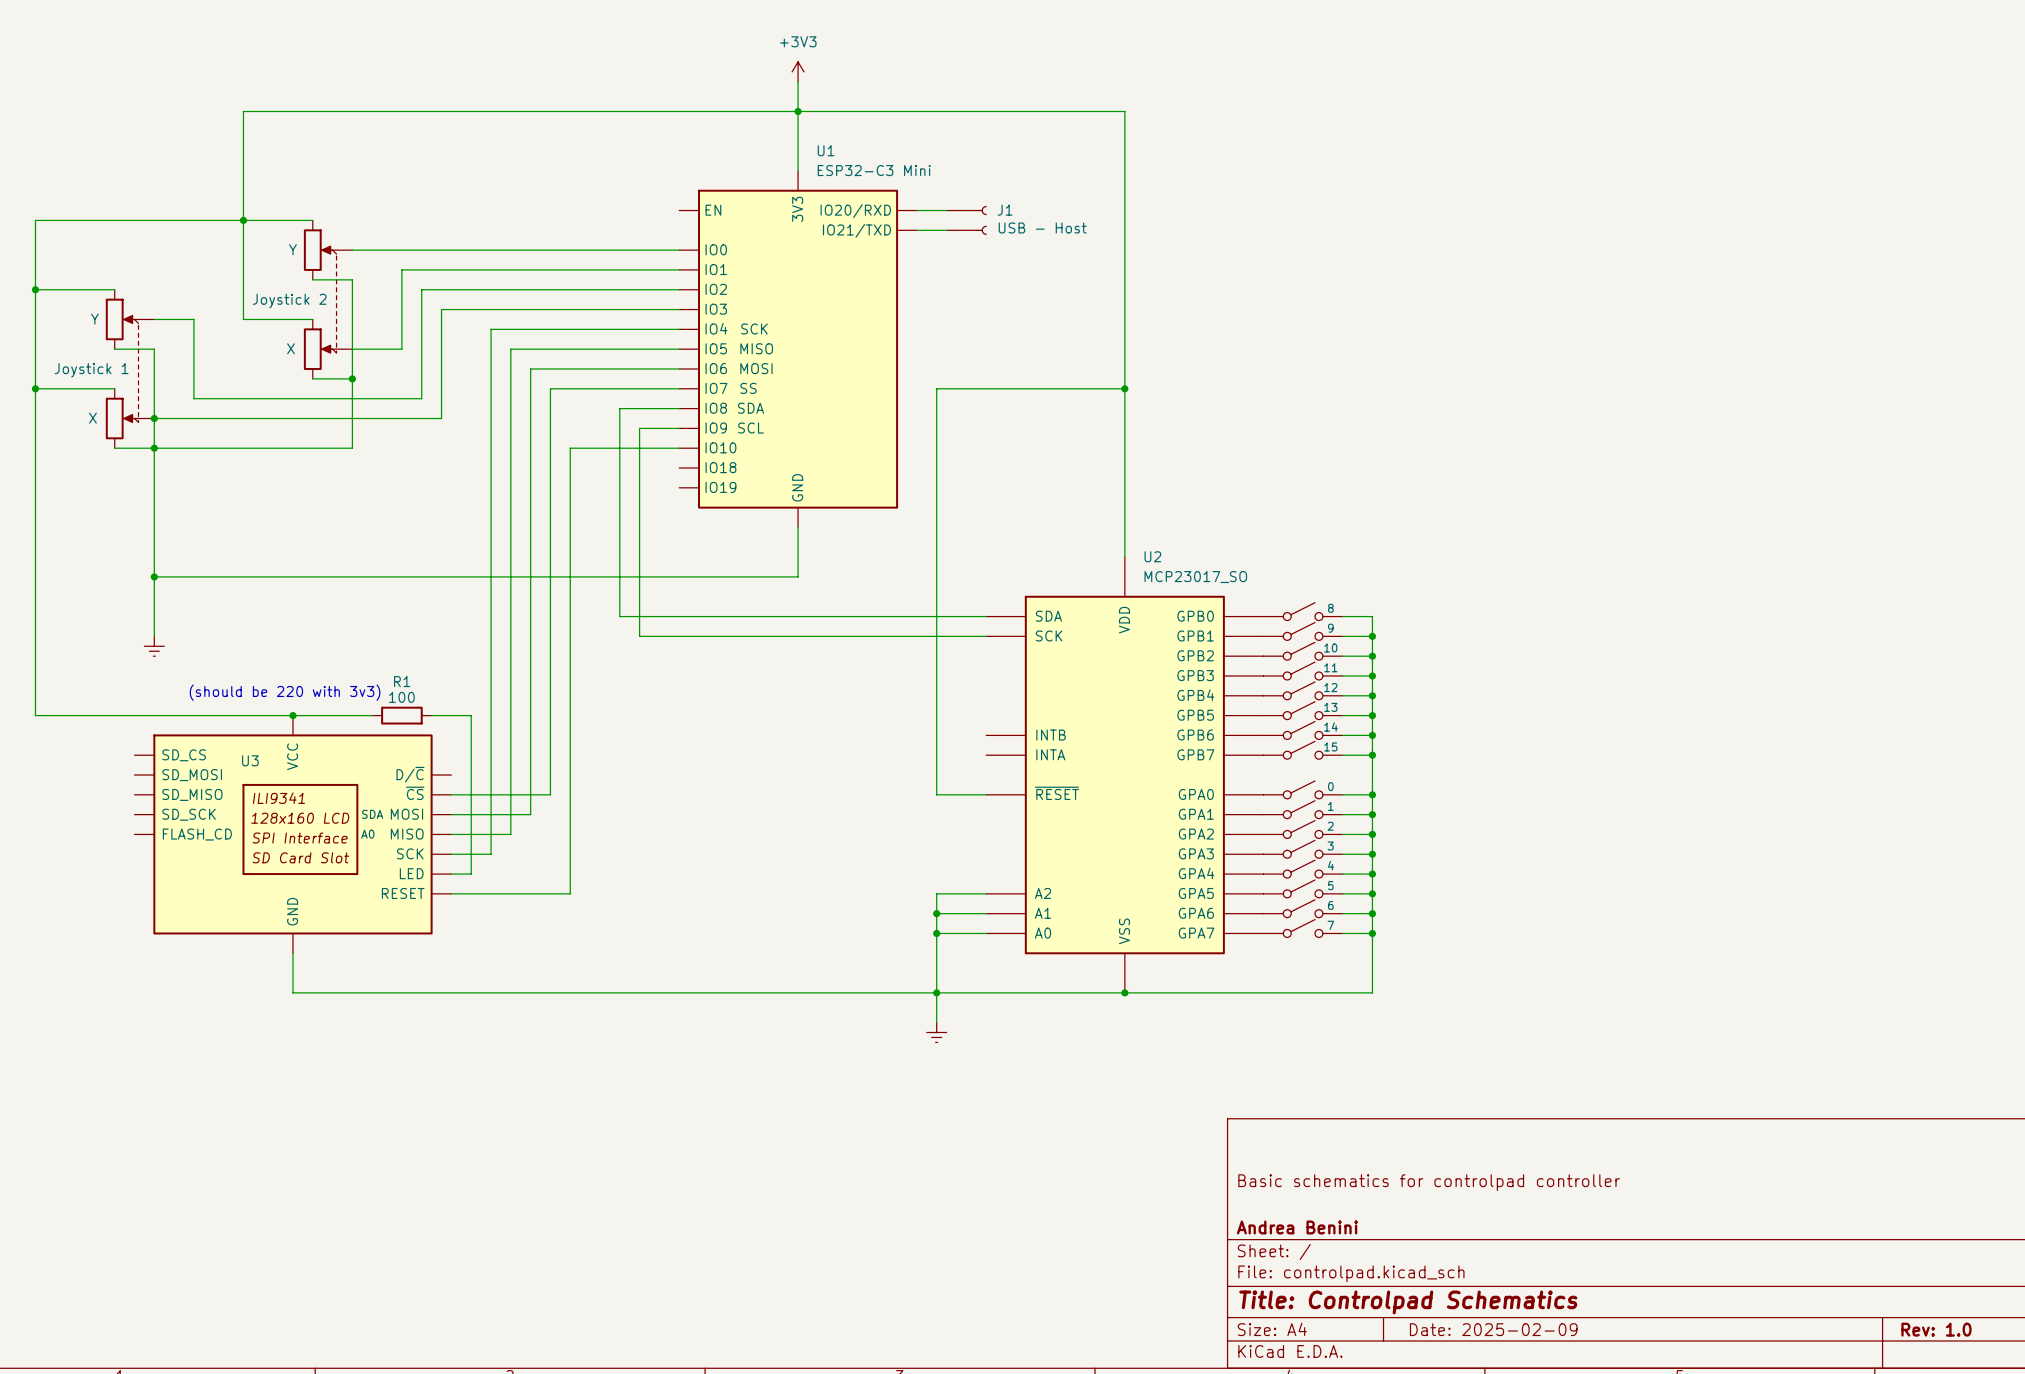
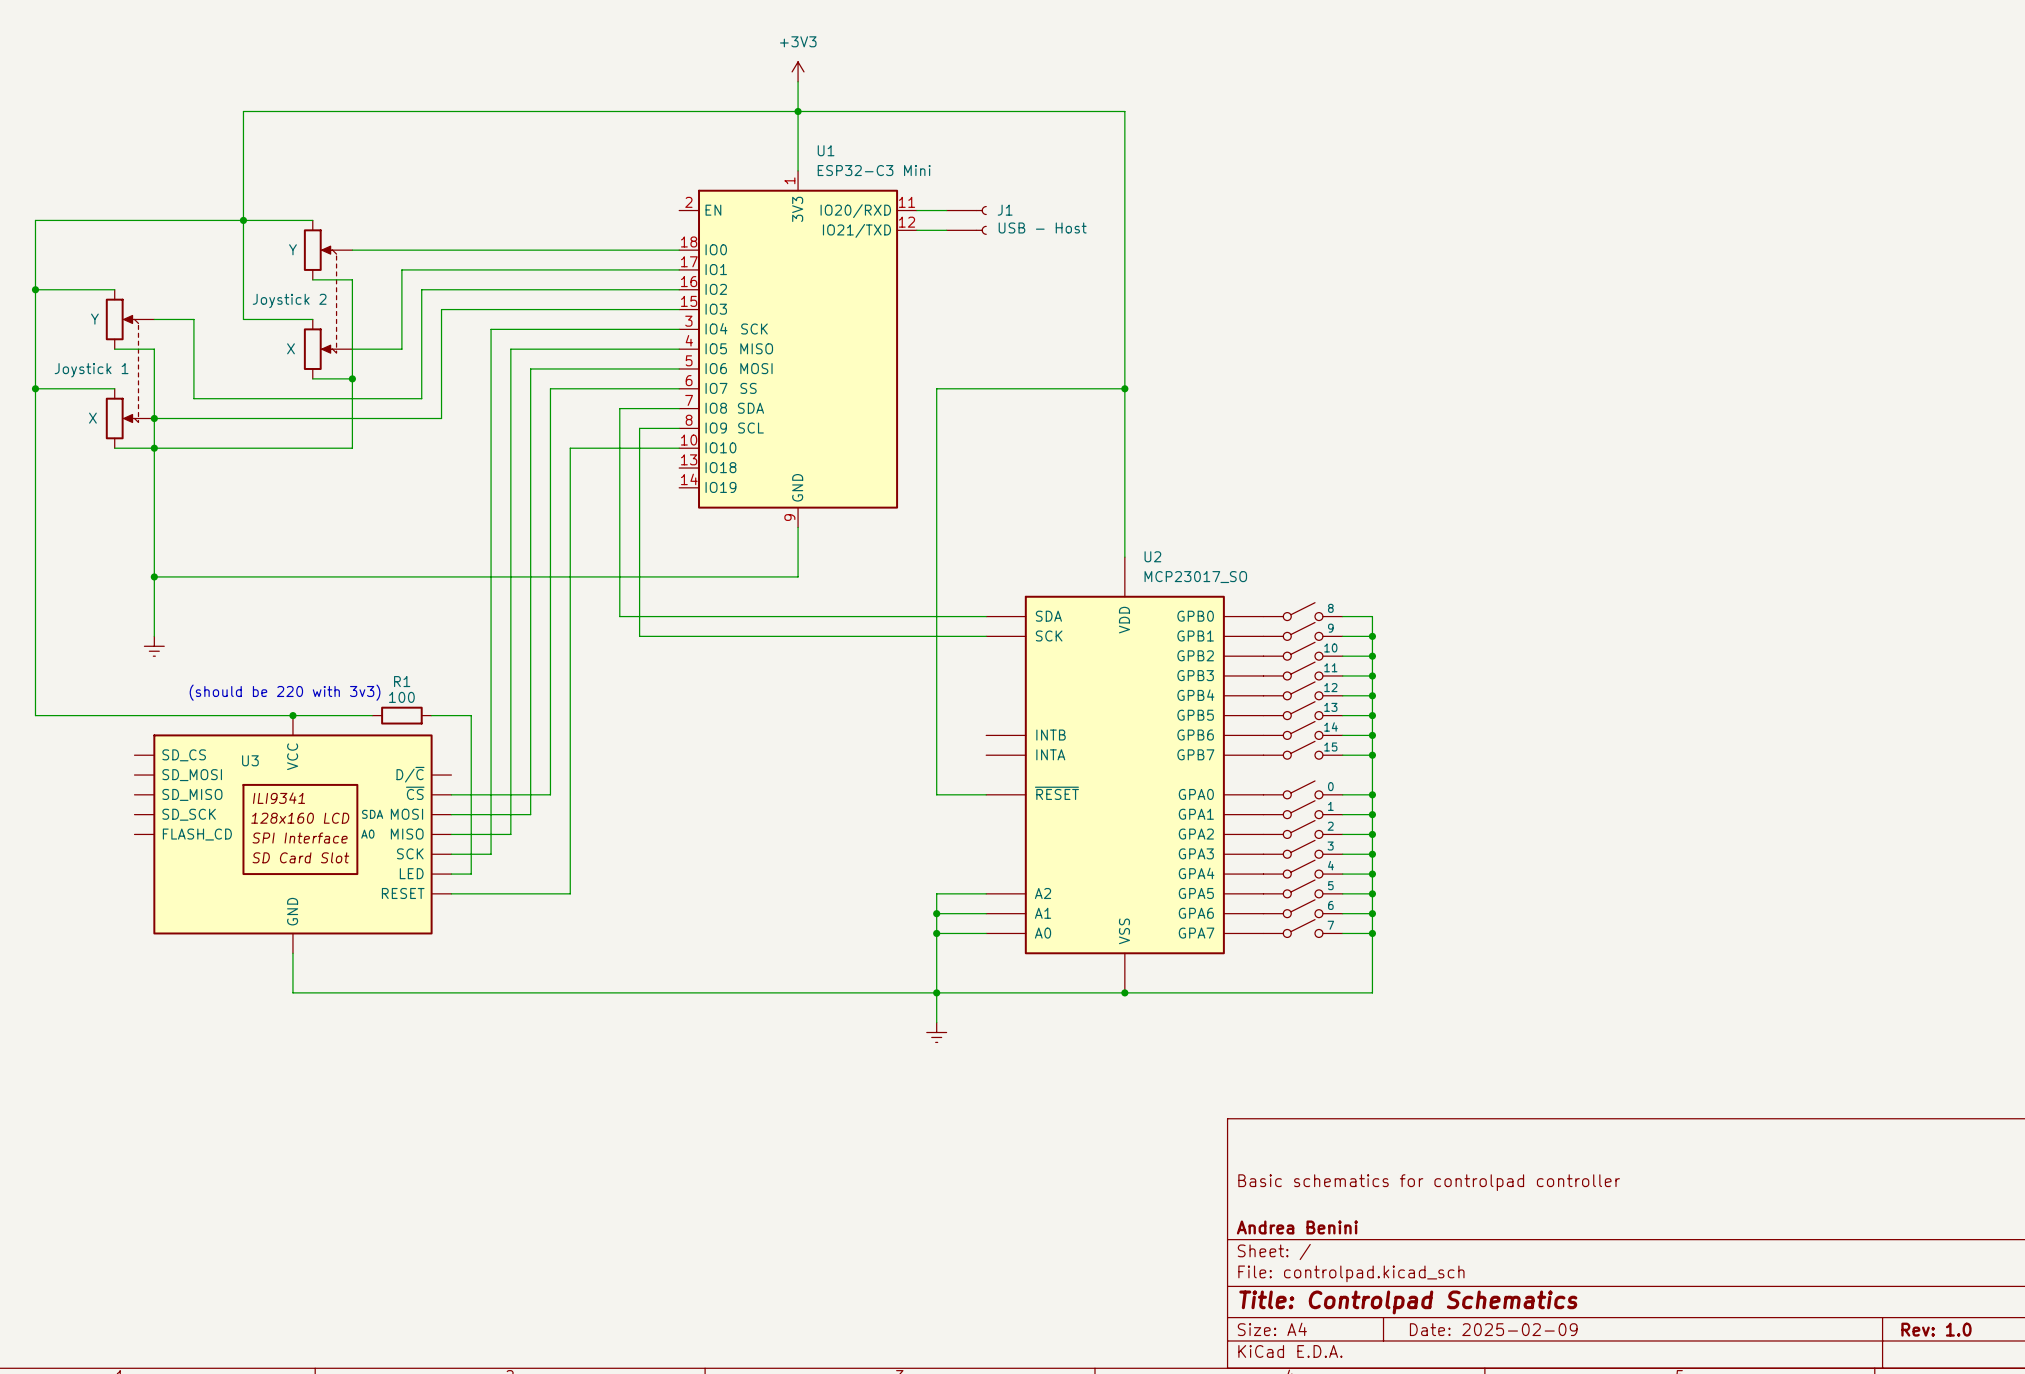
U1 symbol: [679, 170, 917, 528] -> [679, 170, 917, 528]

